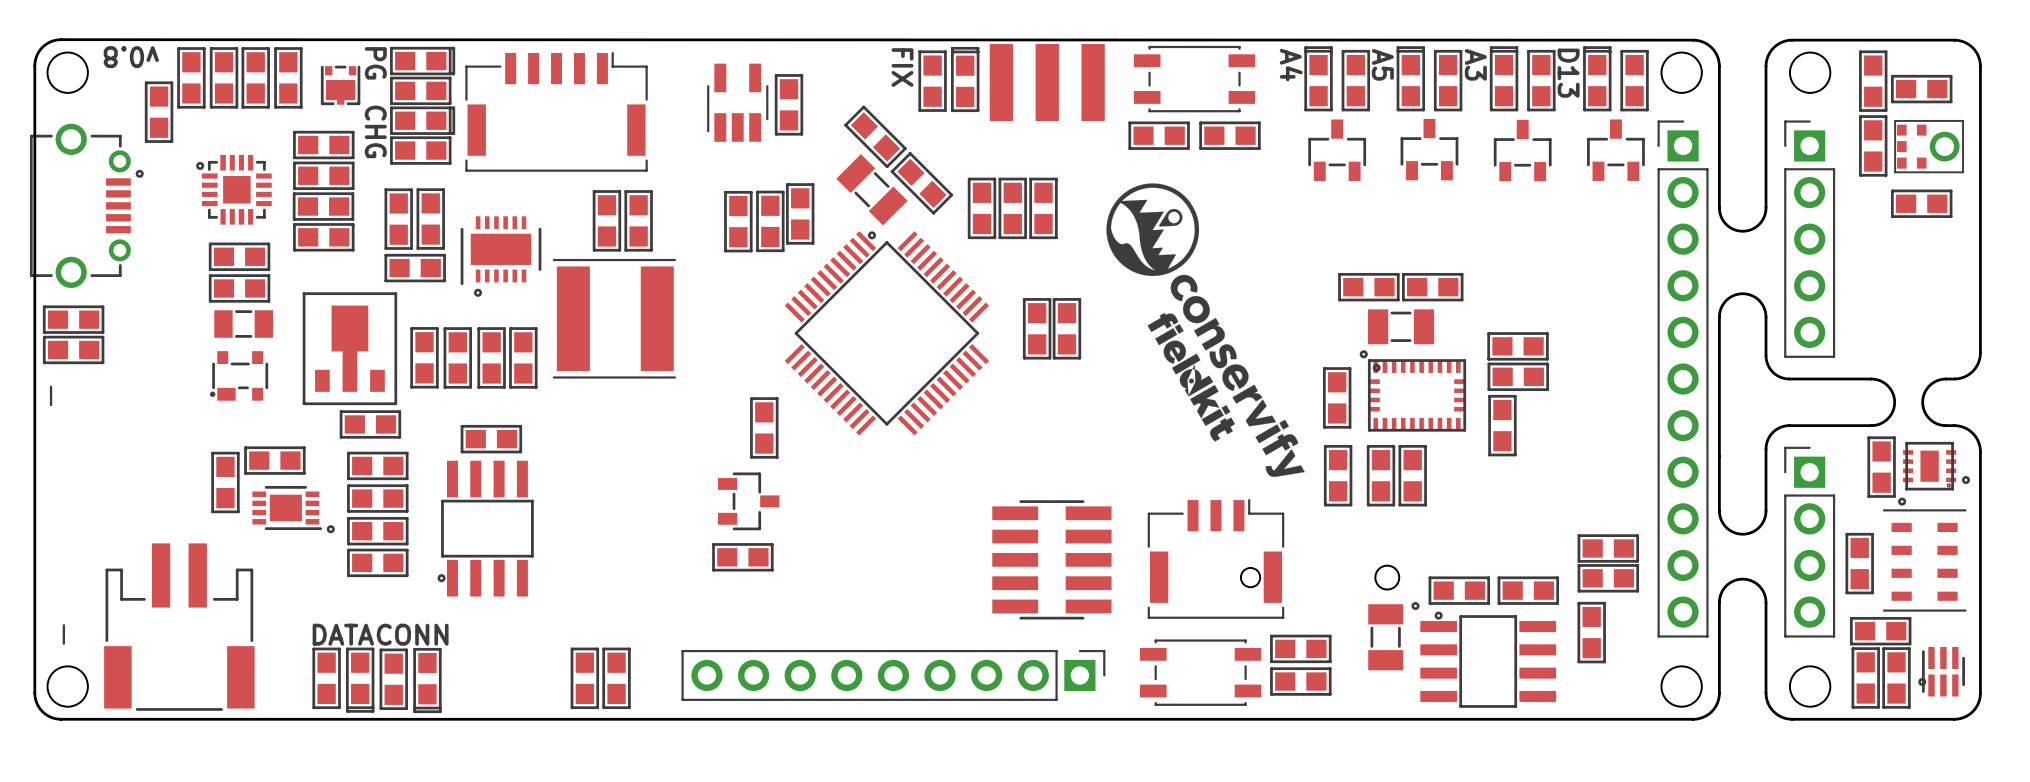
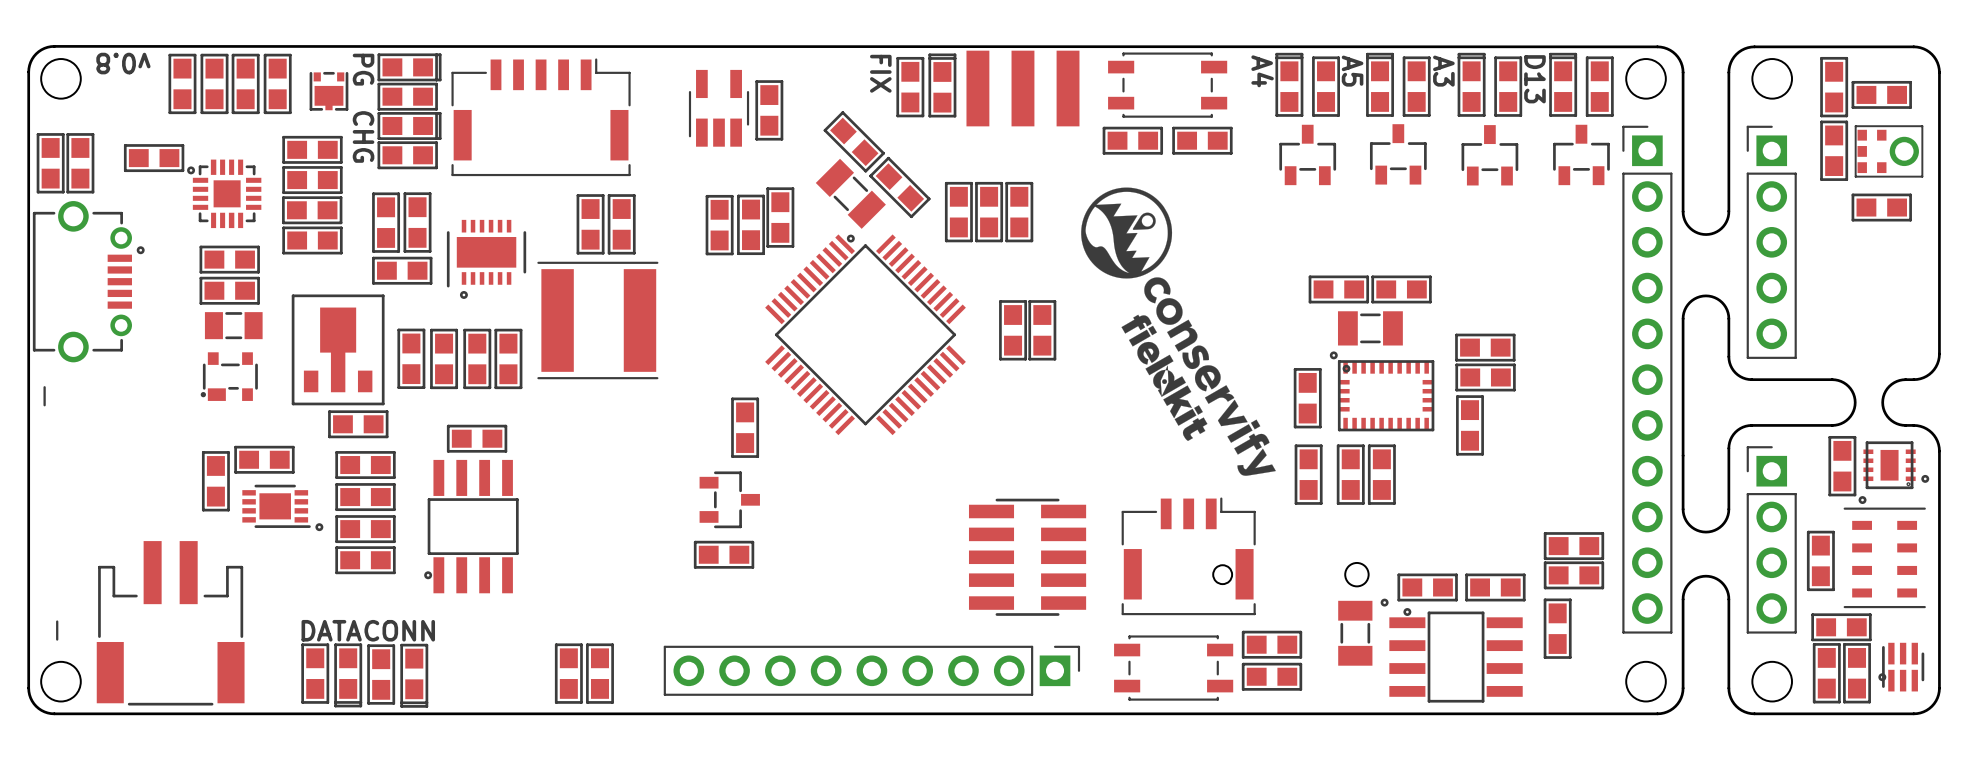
part rotation: 0° (159, 112) -> 90° clockwise (154, 158)
part position: (159, 112) -> (154, 158)
part: none -> (50, 163)
part: none -> (80, 163)
part position: (86, 205) -> (88, 281)
part: (73, 319) -> none
part: (73, 349) -> none

